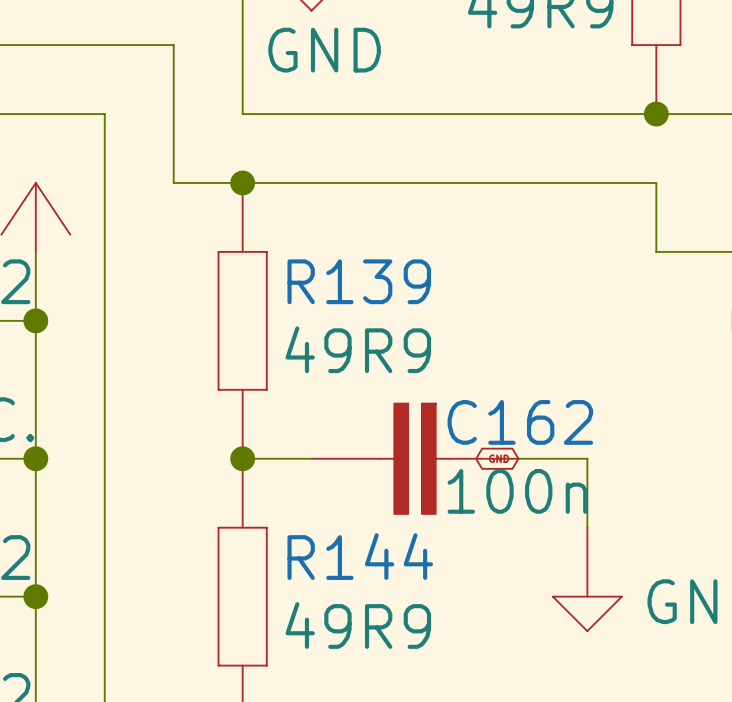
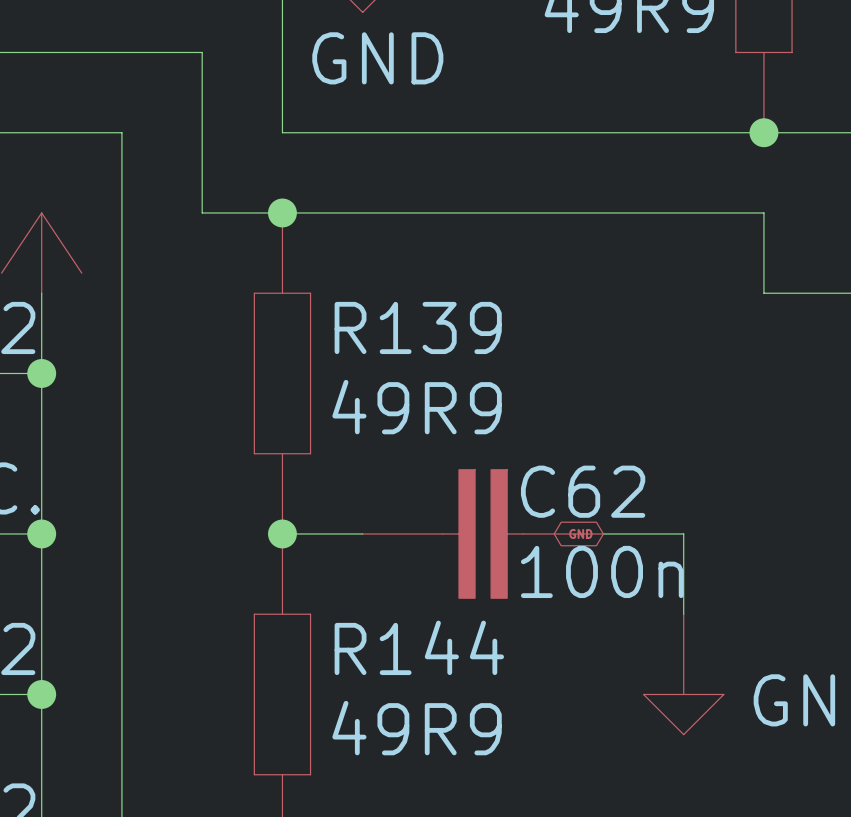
C162 name: C162 (520, 422) -> C62 (583, 491)

